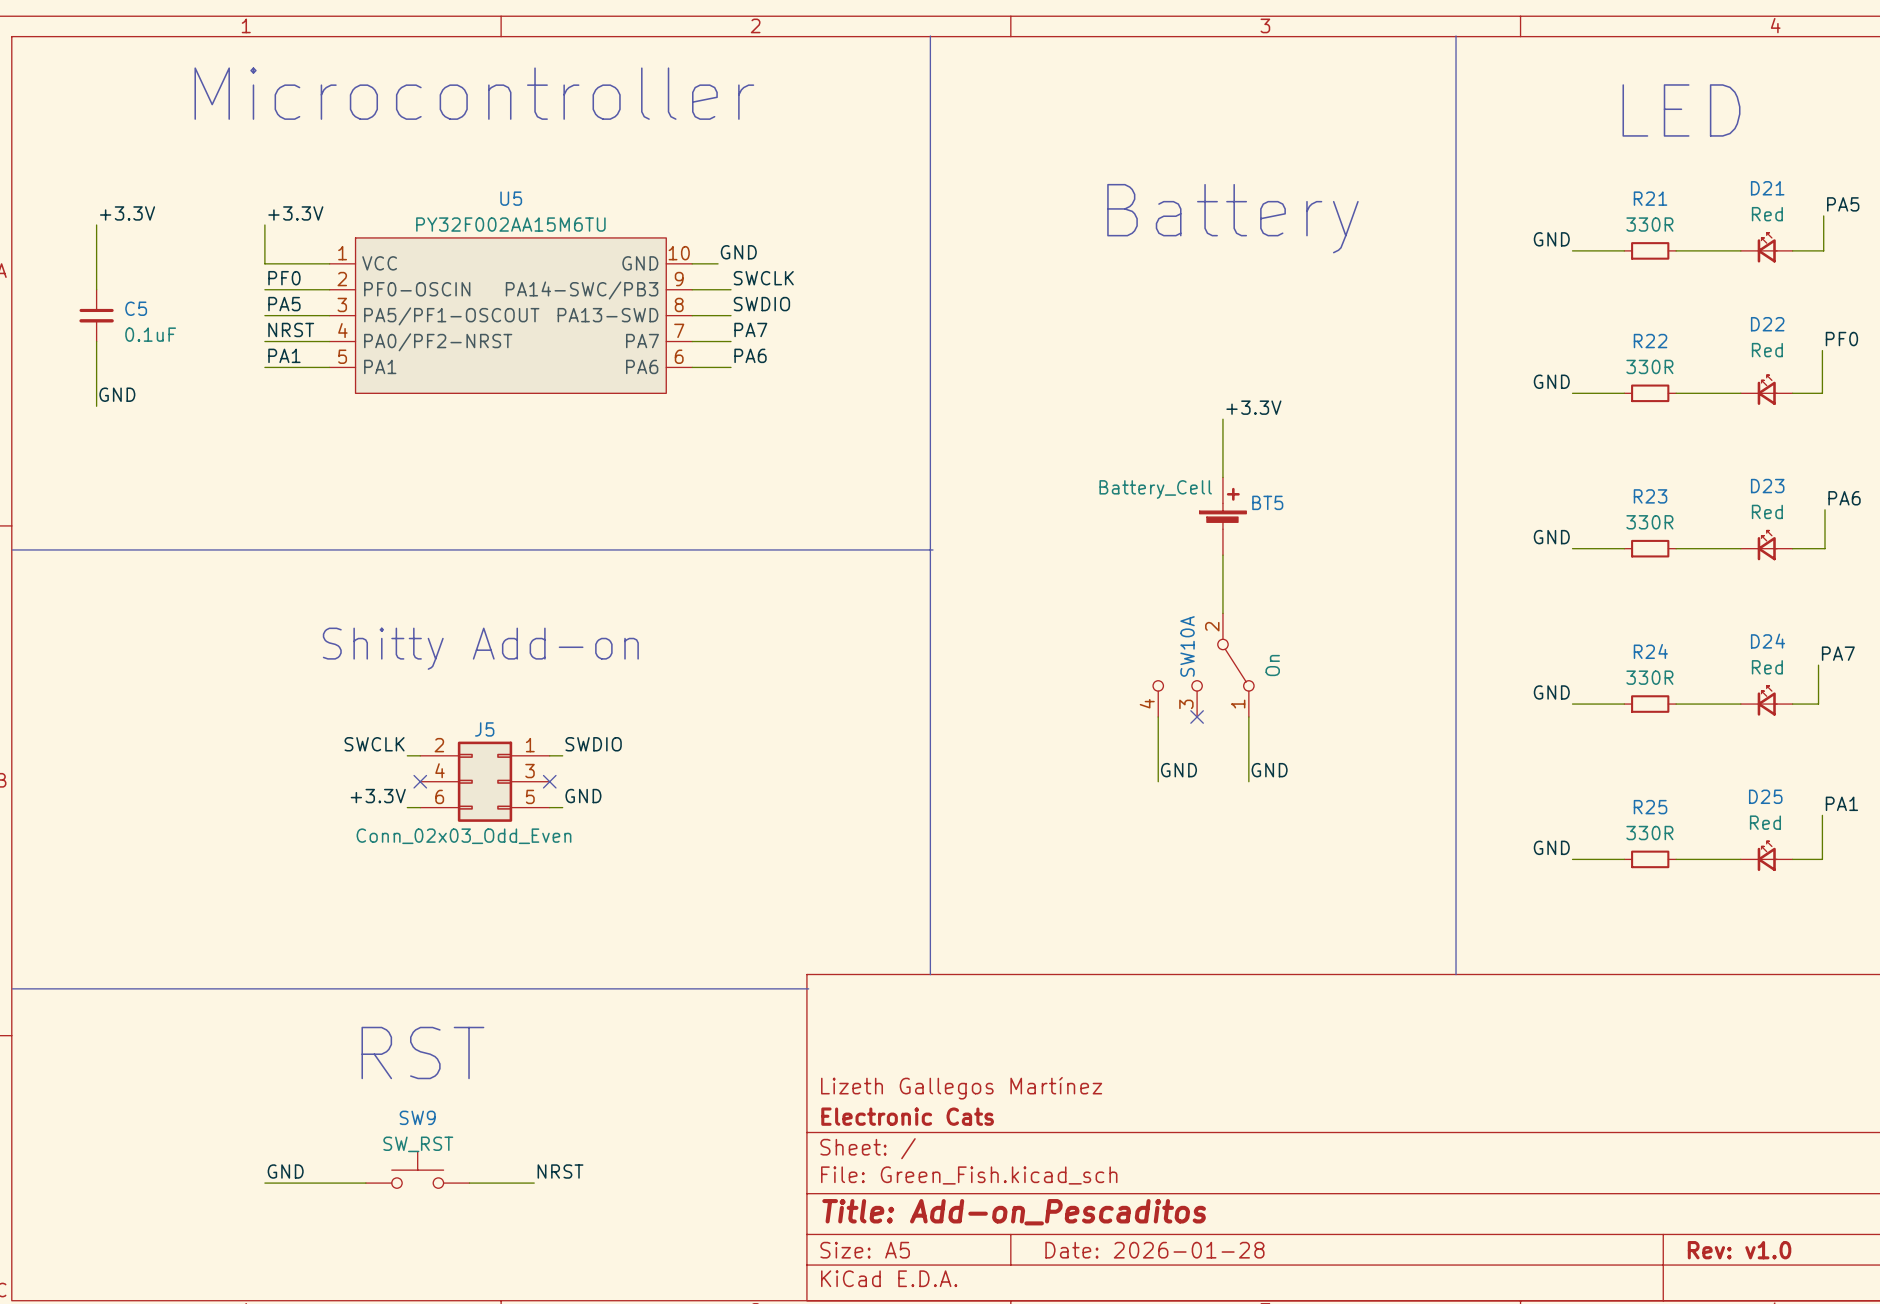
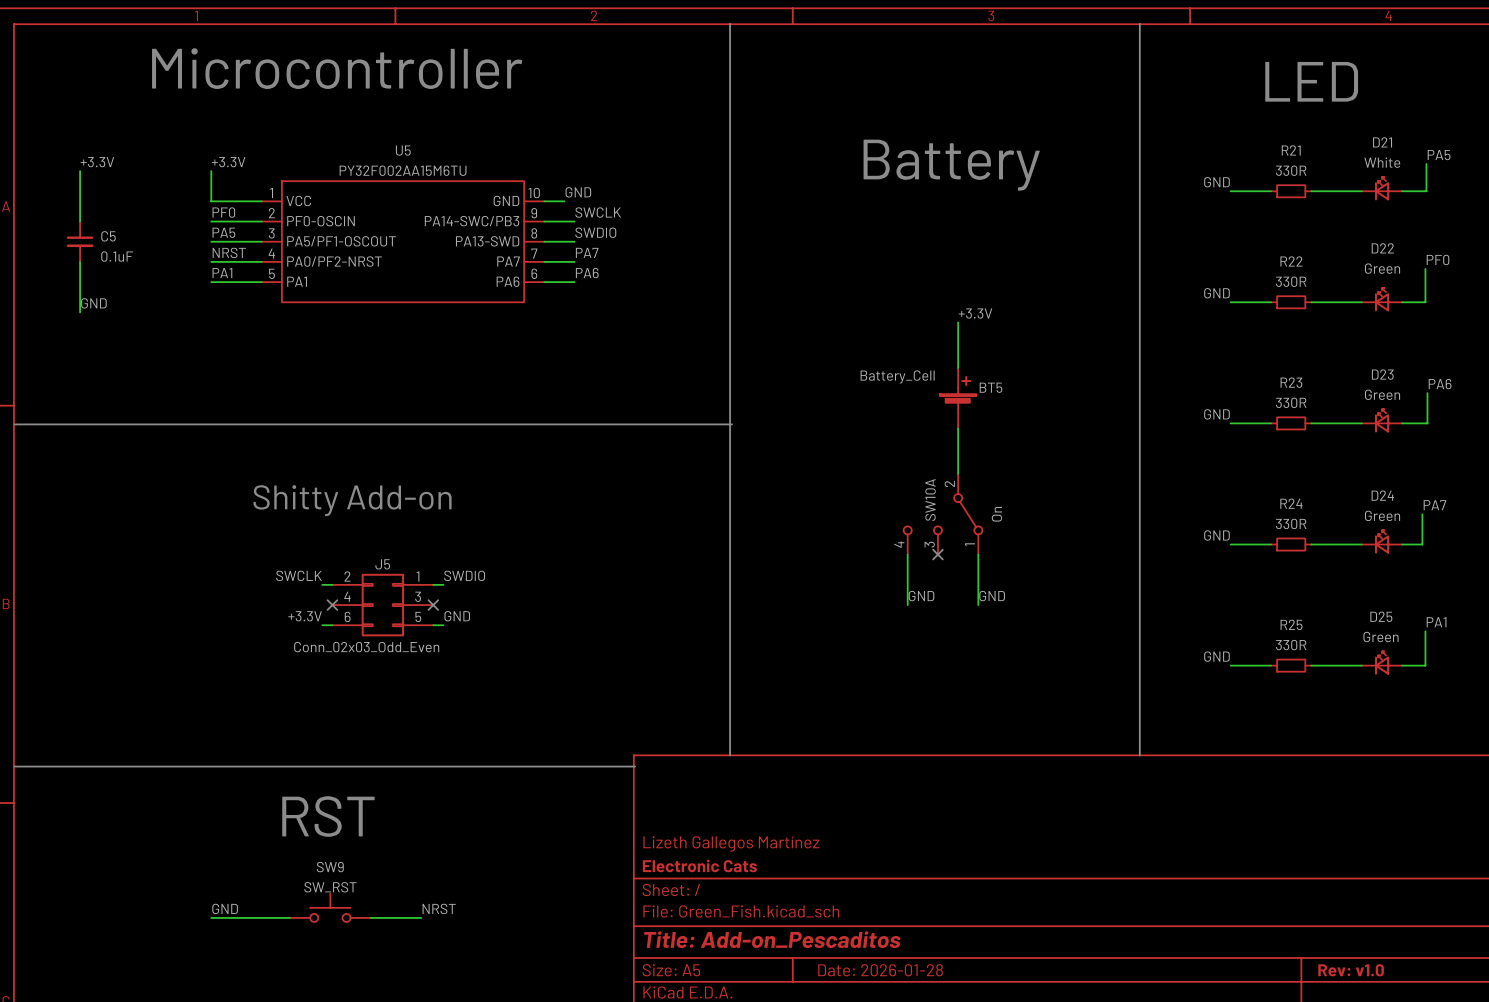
D21 value: Red (1767, 214) -> White (1382, 162)
D22 value: Red (1767, 350) -> Green (1382, 268)
D23 value: Red (1767, 511) -> Green (1382, 394)
D24 value: Red (1767, 667) -> Green (1382, 515)
D25 value: Red (1765, 822) -> Green (1381, 636)

